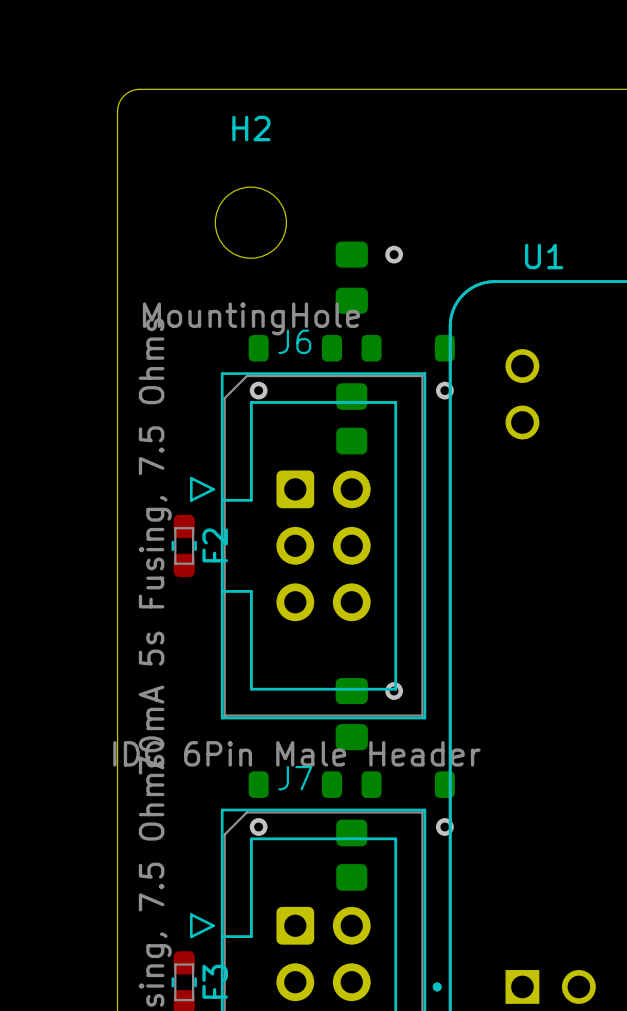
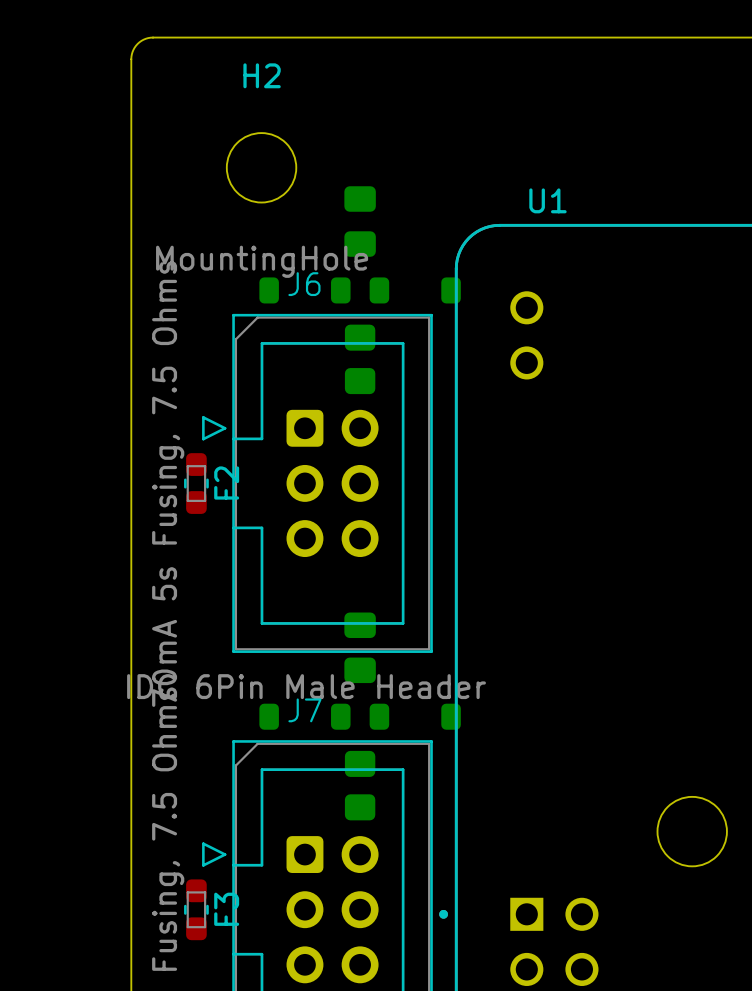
via: (394, 254) -> none
via: (258, 390) -> none
via: (444, 390) -> none
via: (394, 691) -> none
via: (258, 826) -> none
via: (444, 826) -> none

